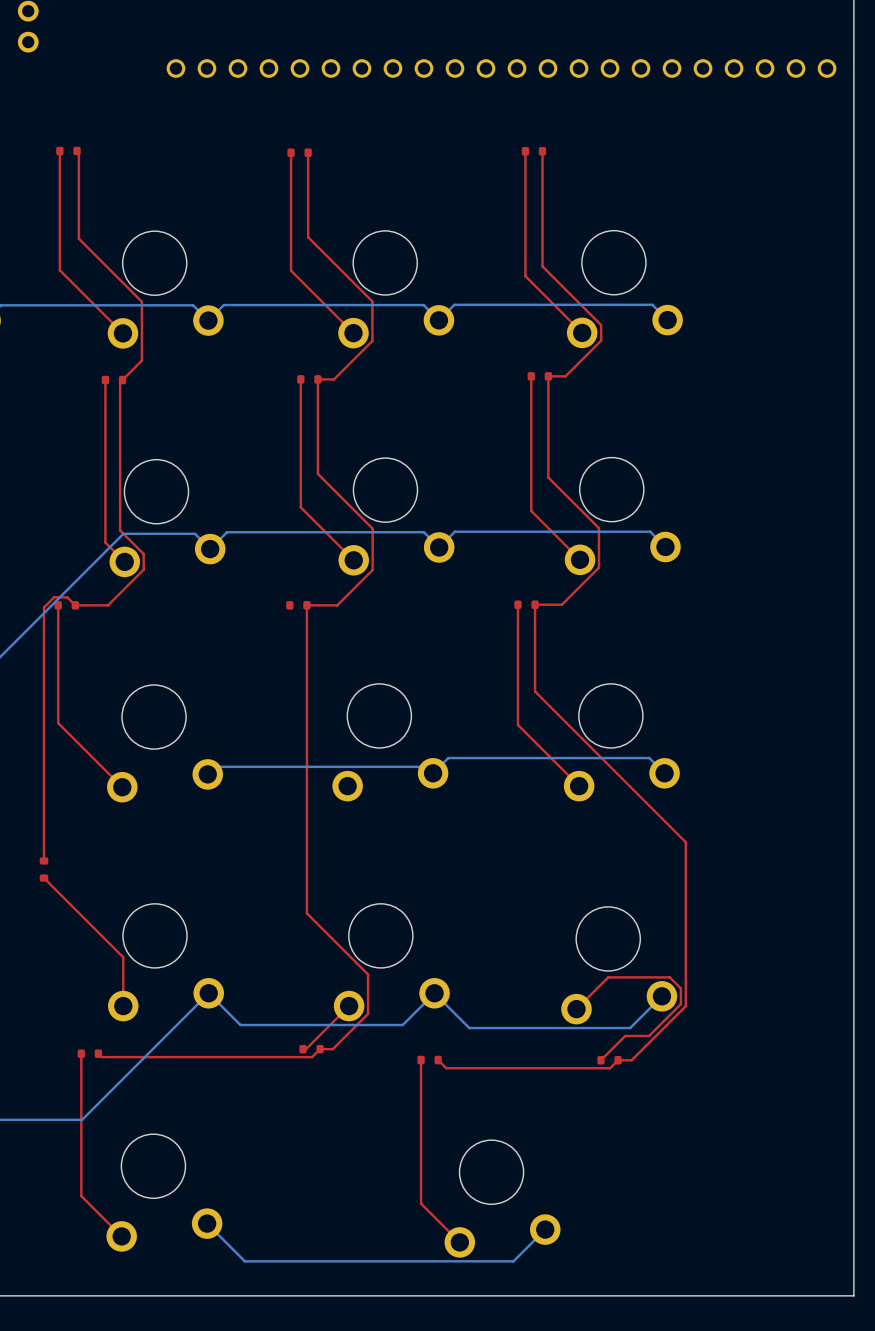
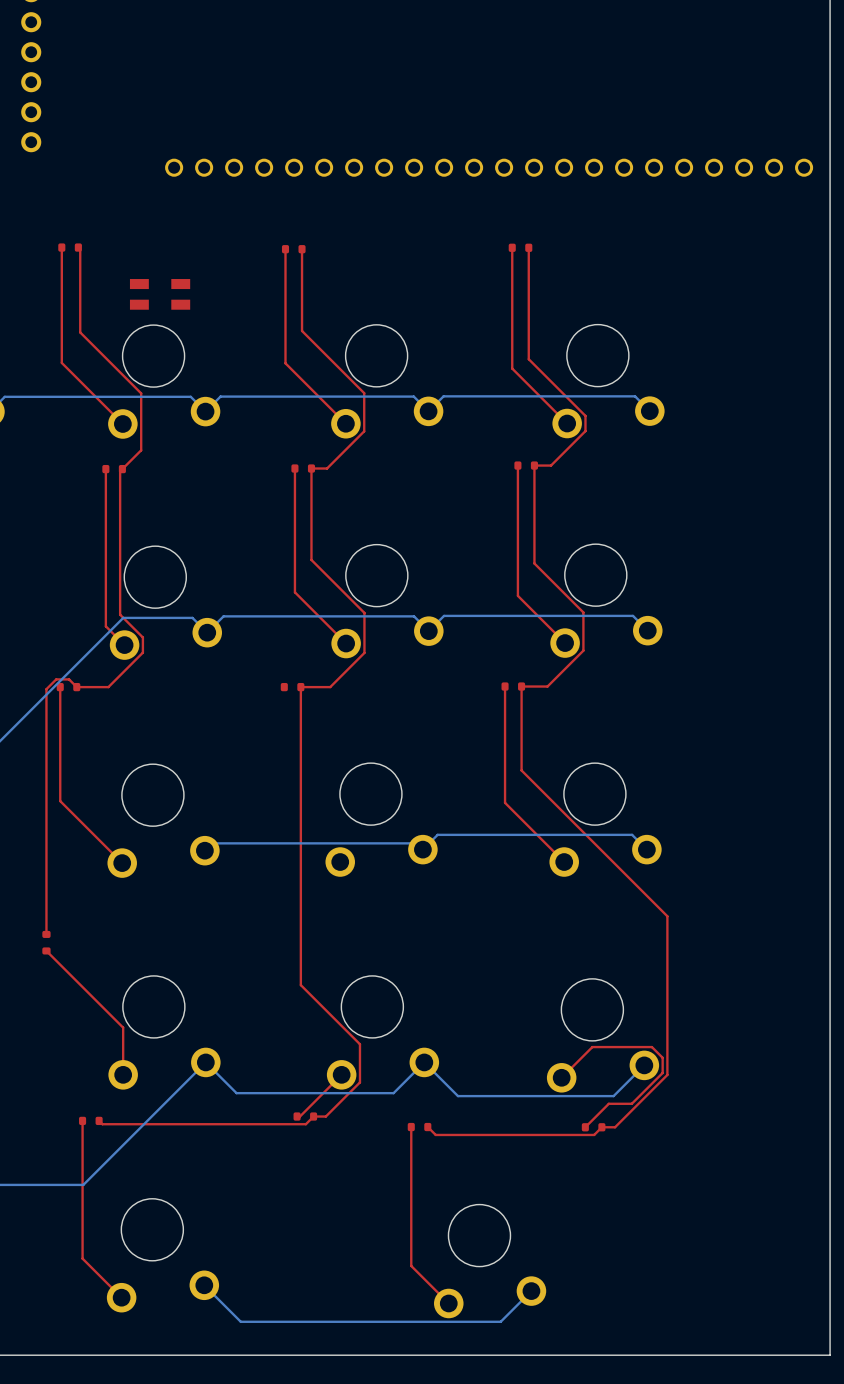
part: none -> (160, 294)

